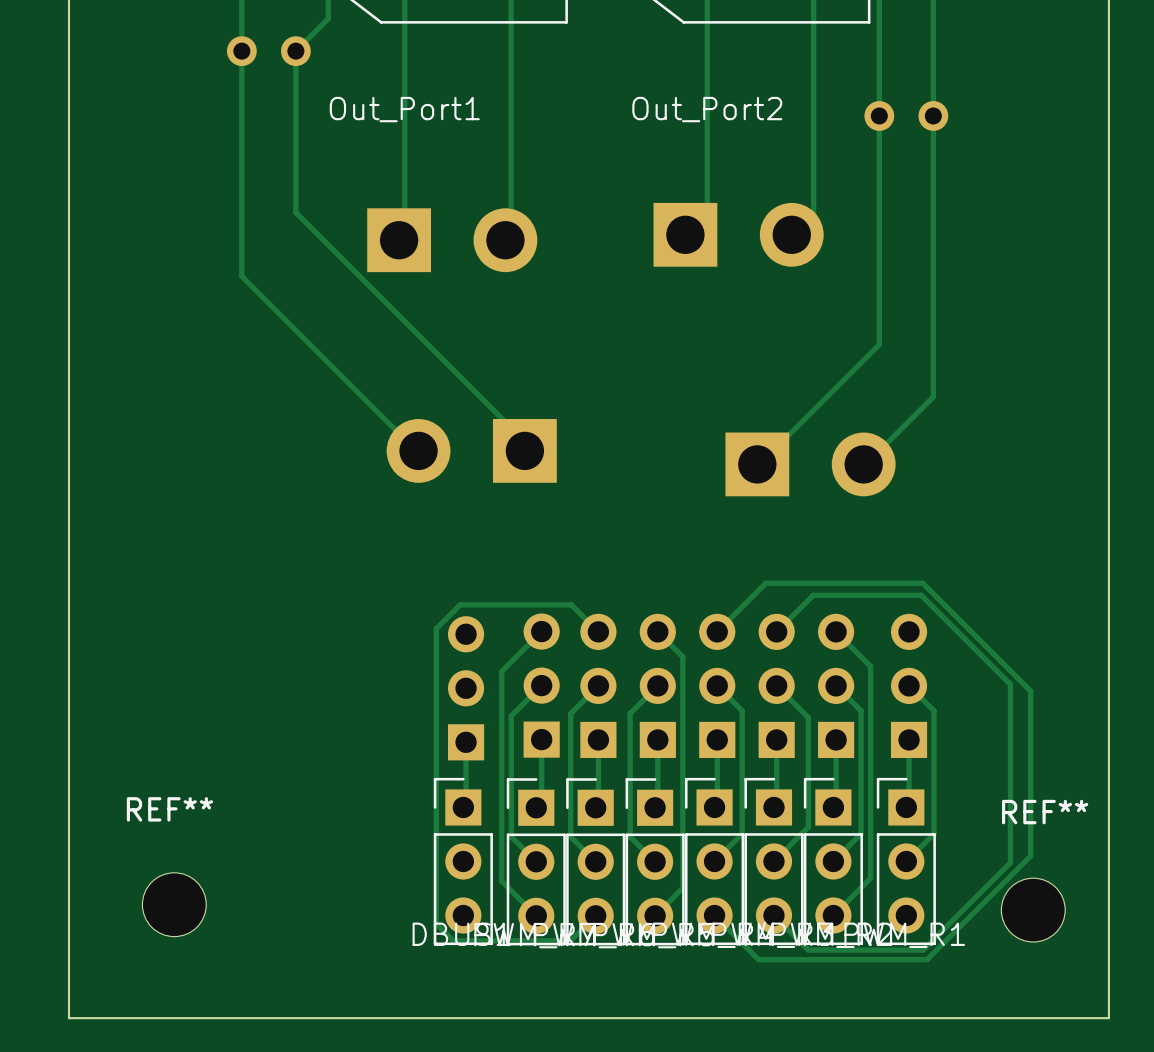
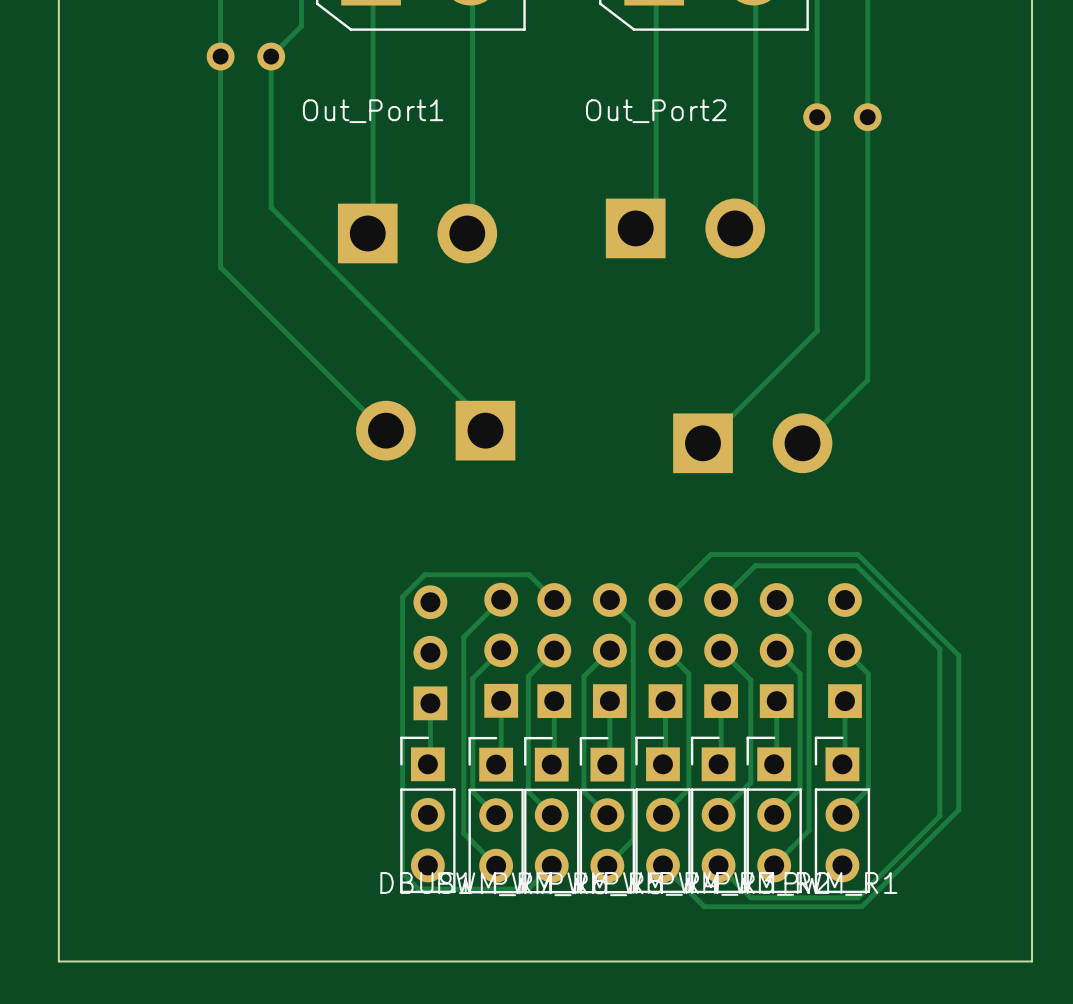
REF**: (174, 904) -> none
REF**: (1033, 910) -> none

